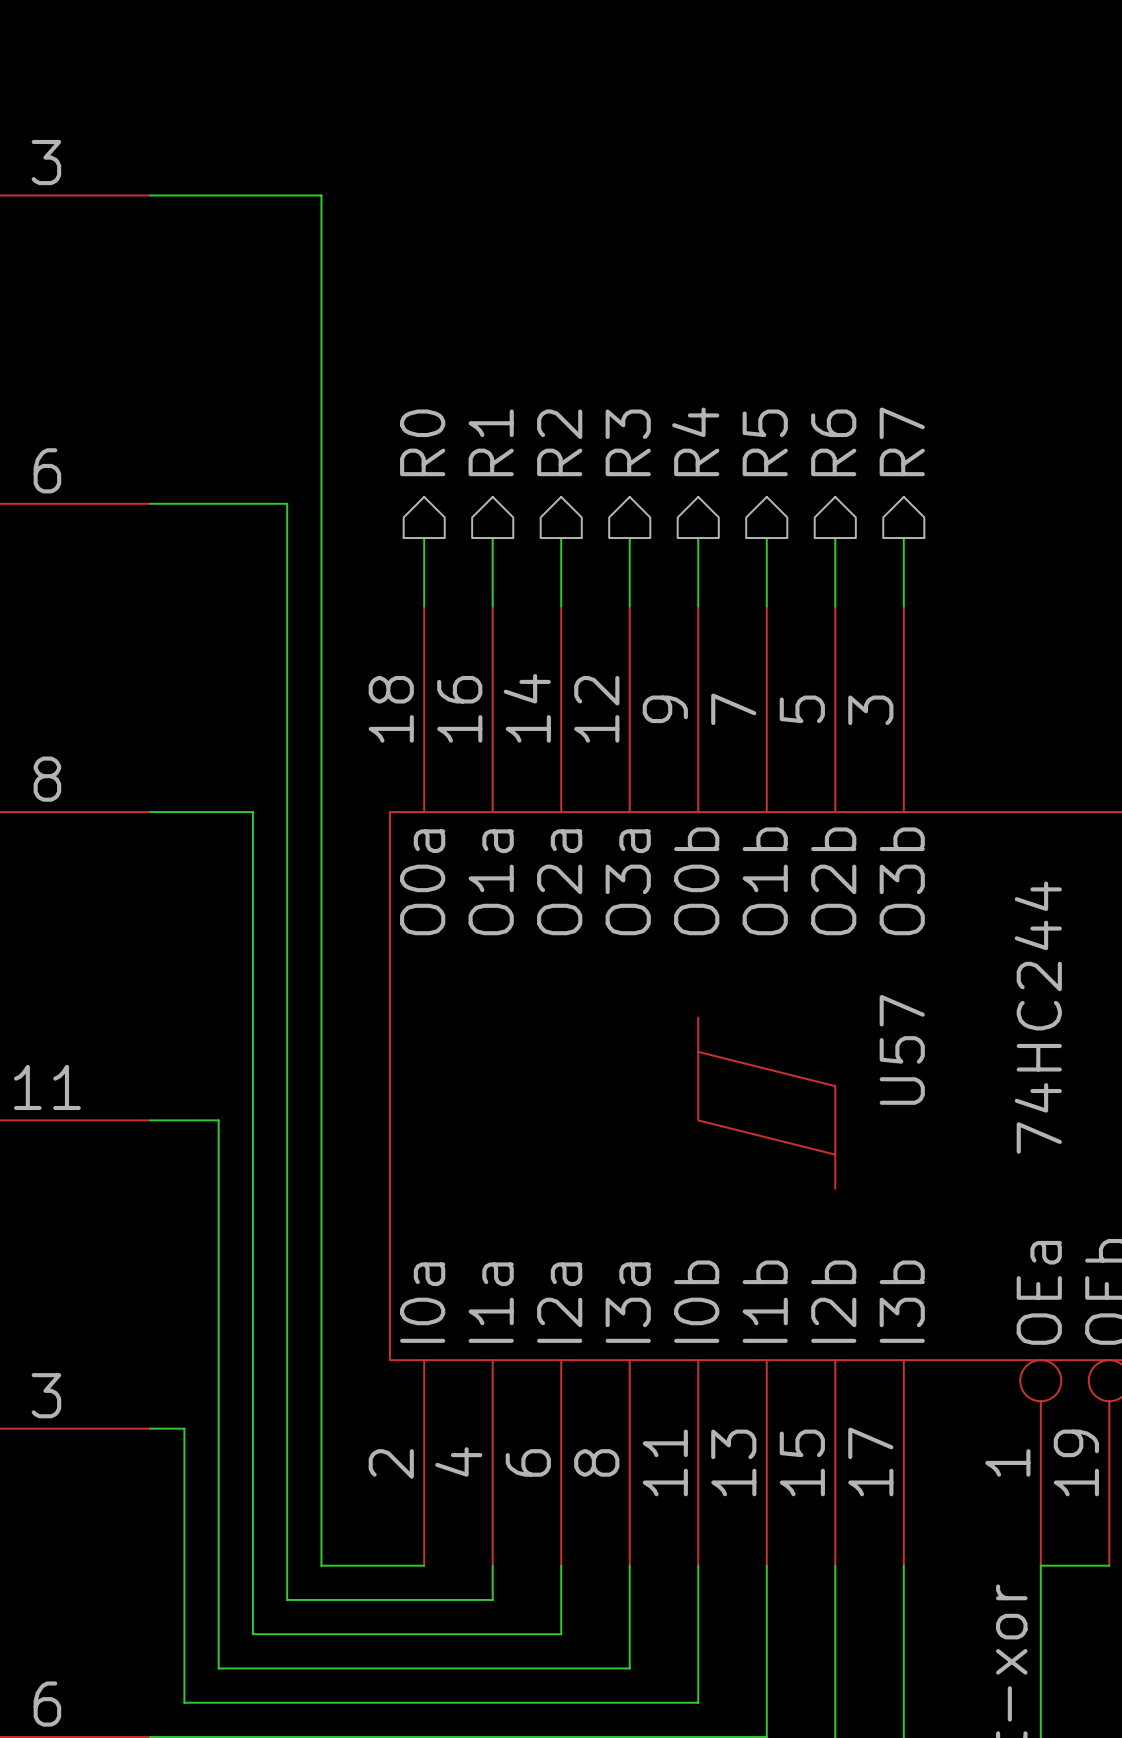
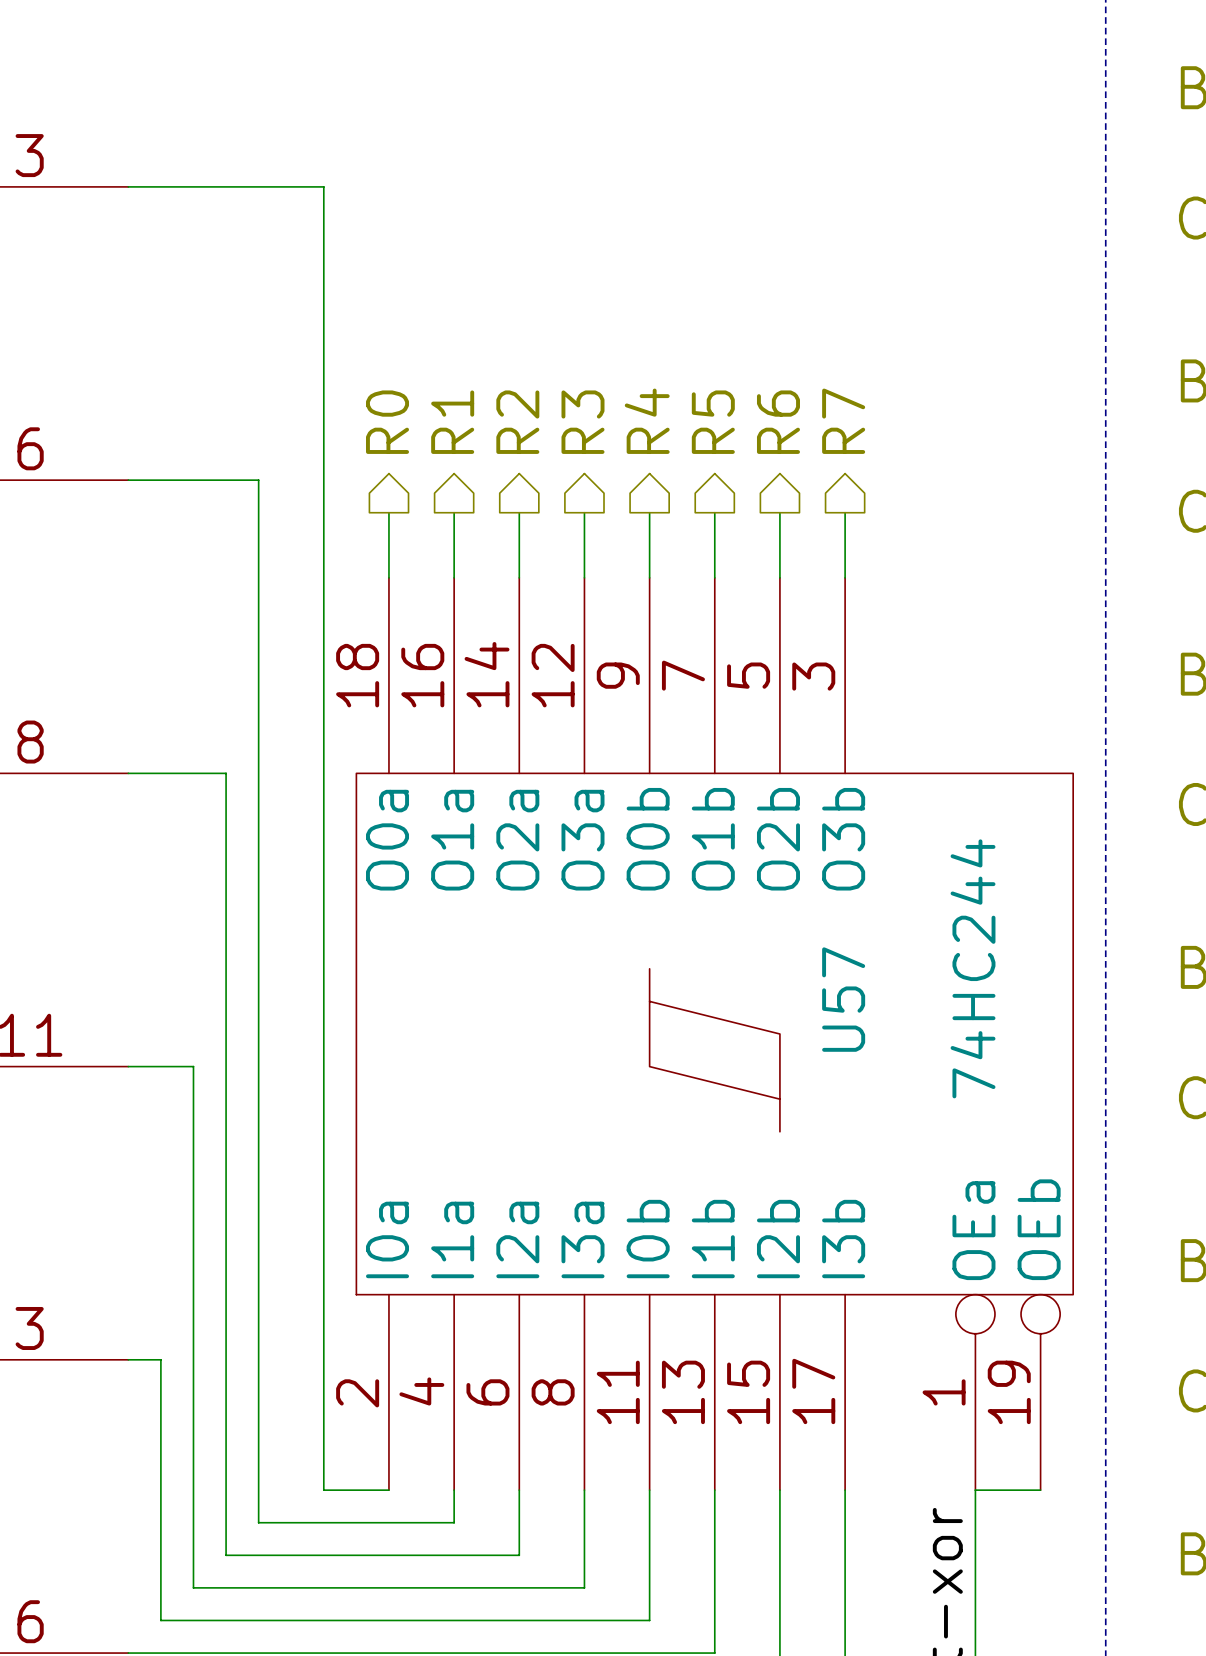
wire: (321, 195) (321, 1565) (355, 1565) -> (291, 186) (323, 186) (323, 1490)

